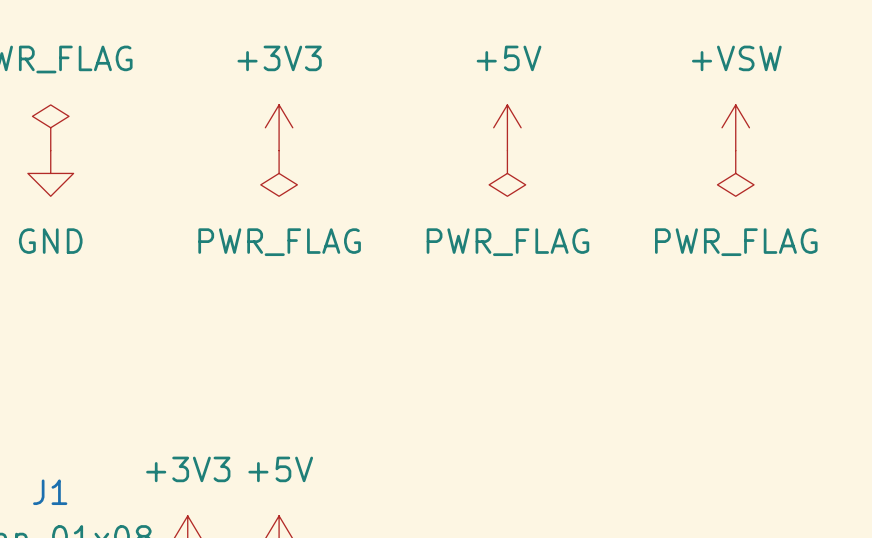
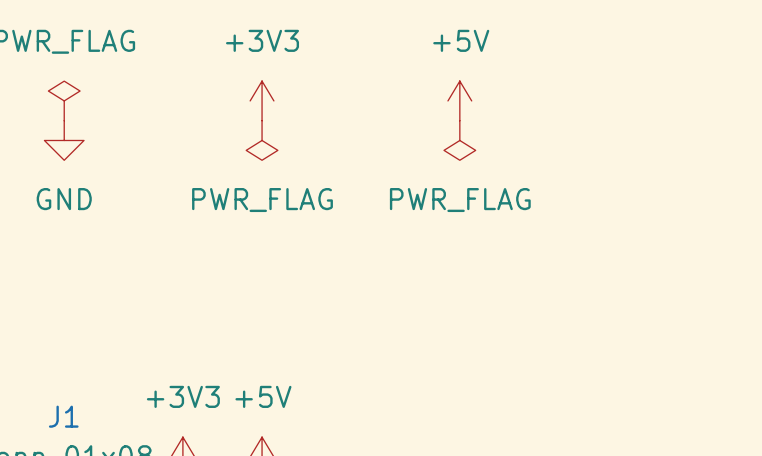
power symbol: +VSW (735, 127) -> none
power symbol: PWR_FLAG (735, 173) -> none

